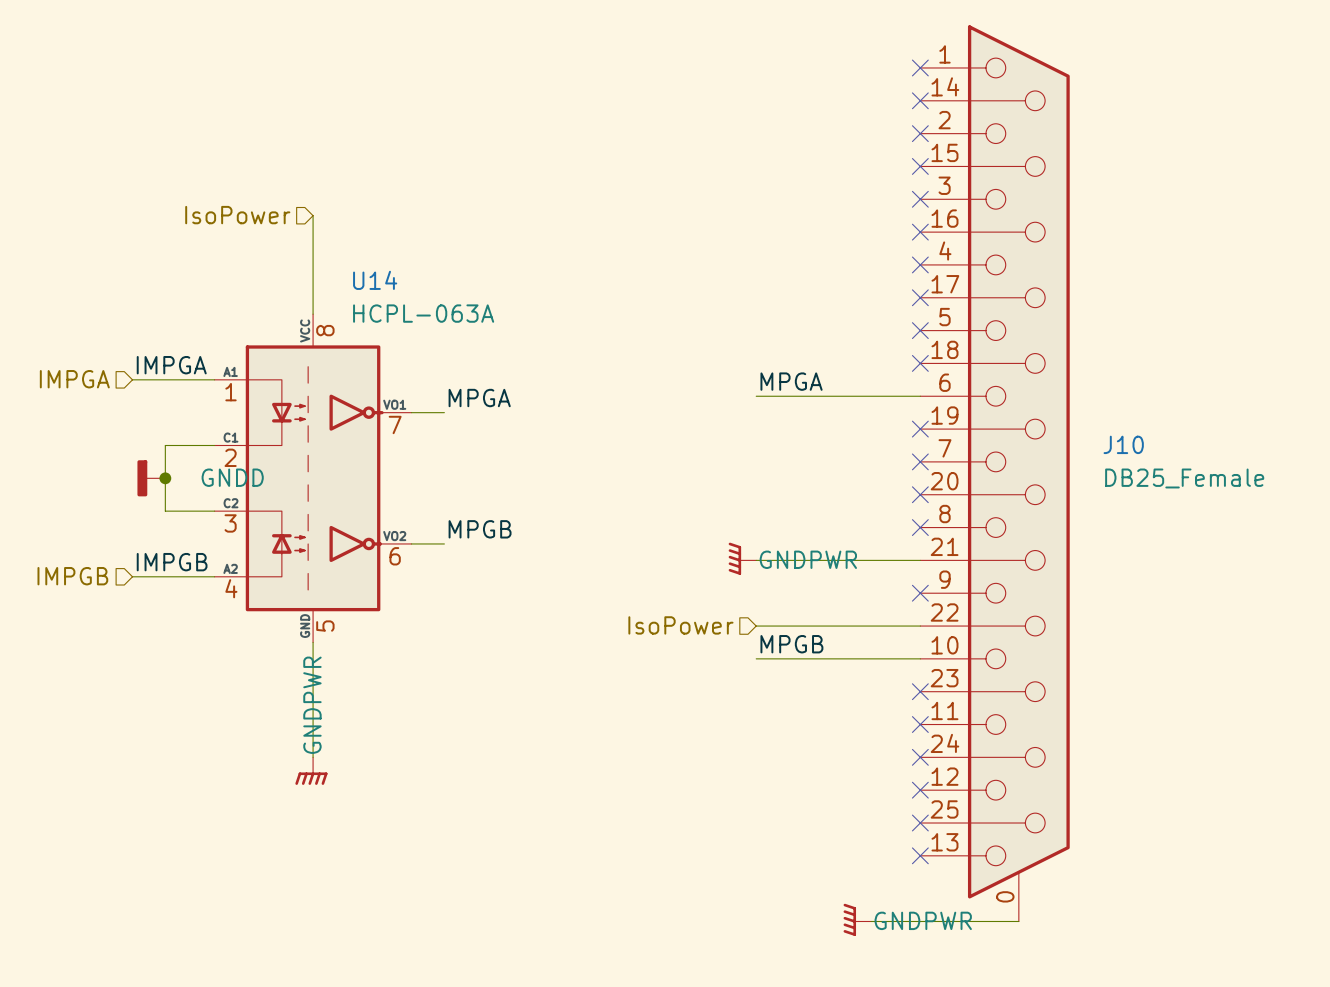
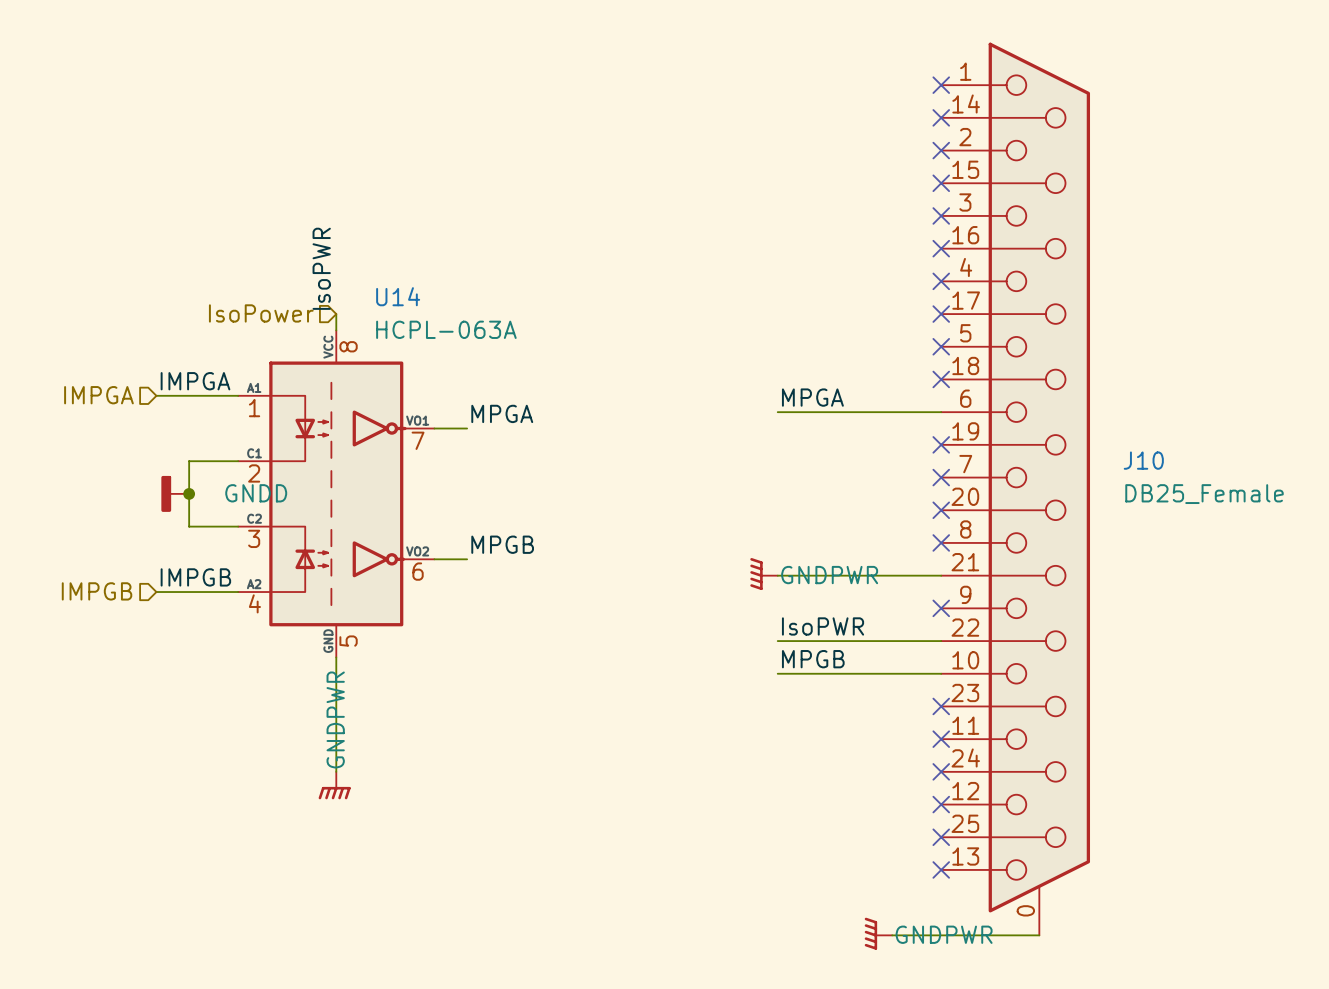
hierarchical label position: IsoPower (237, 215) -> IsoPower (261, 313)
wire: (313, 215) (313, 297) -> none
label: none -> IsoPWR (321, 268)
label: none -> IsoPWR (823, 626)
hierarchical label: IsoPower (680, 625) -> none

